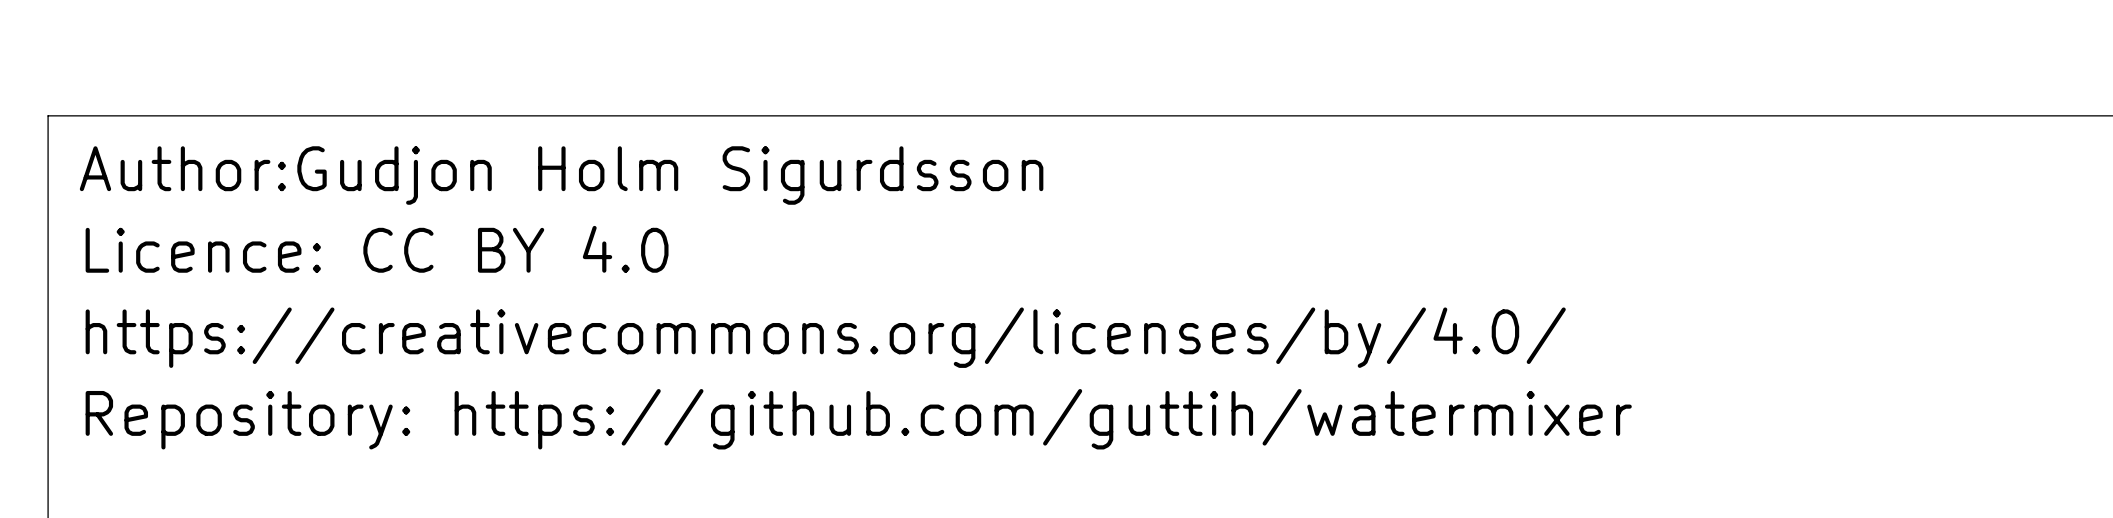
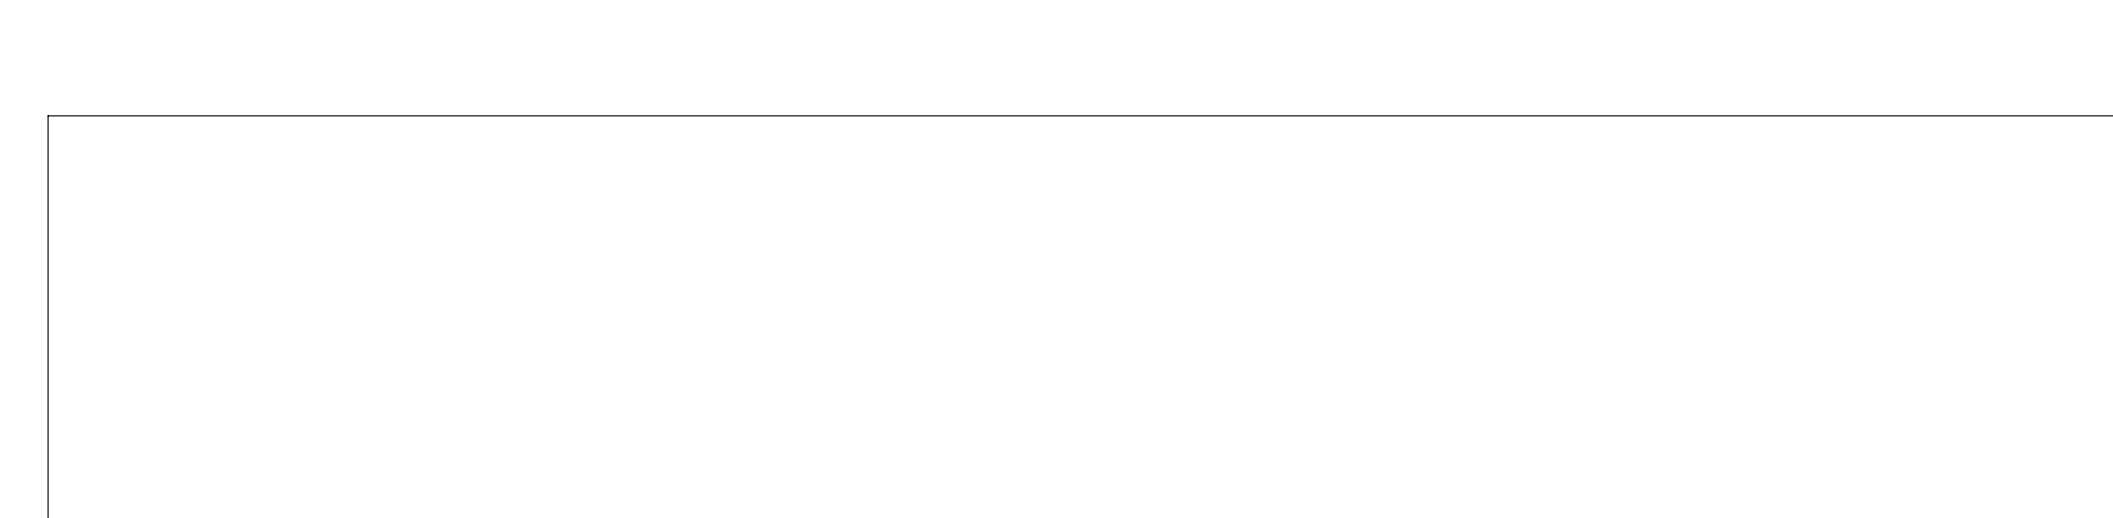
title block: Author:Gudjon Holm Sigurdsson (561, 175) -> none
title block: Licence: CC BY 4.0 (377, 249) -> none
title block: https://creativecommons.org/licenses/by/4.0/ (825, 337) -> none
title block: Repository: https://github.com/guttih/watermixer (858, 419) -> none

